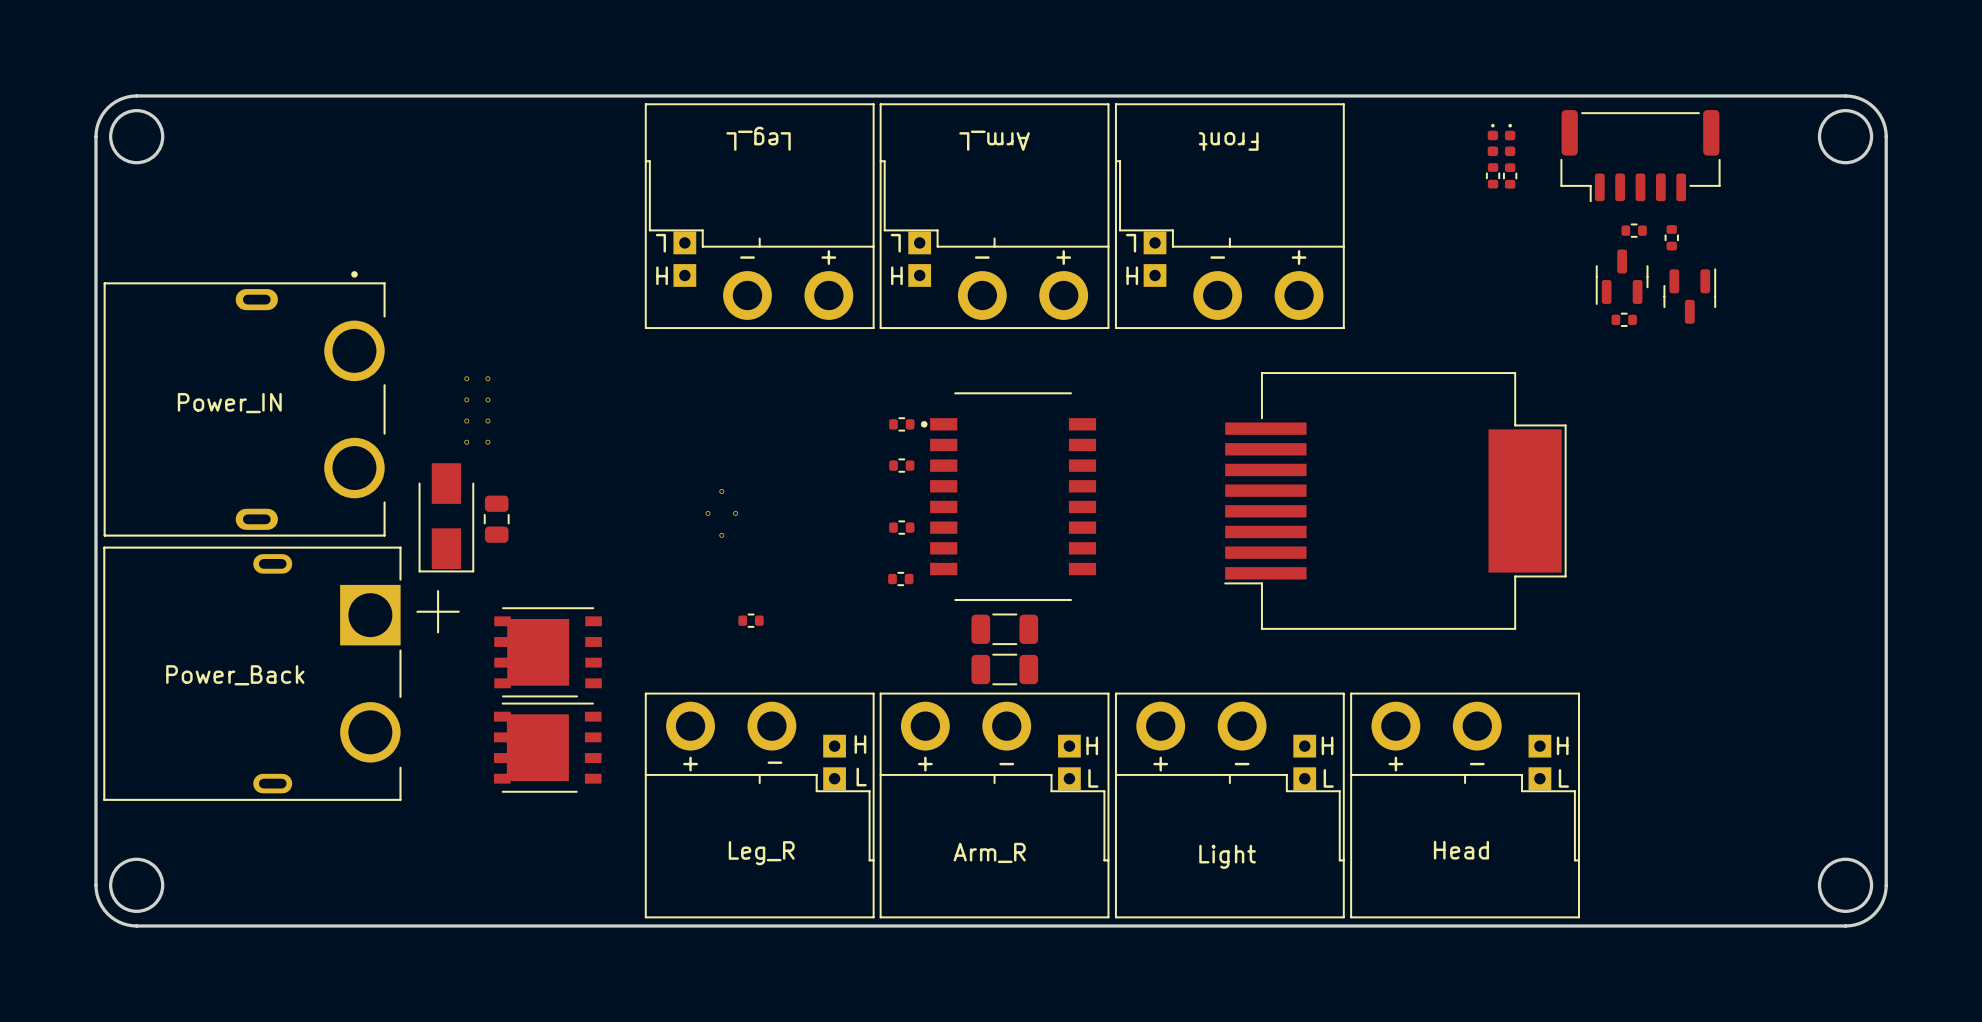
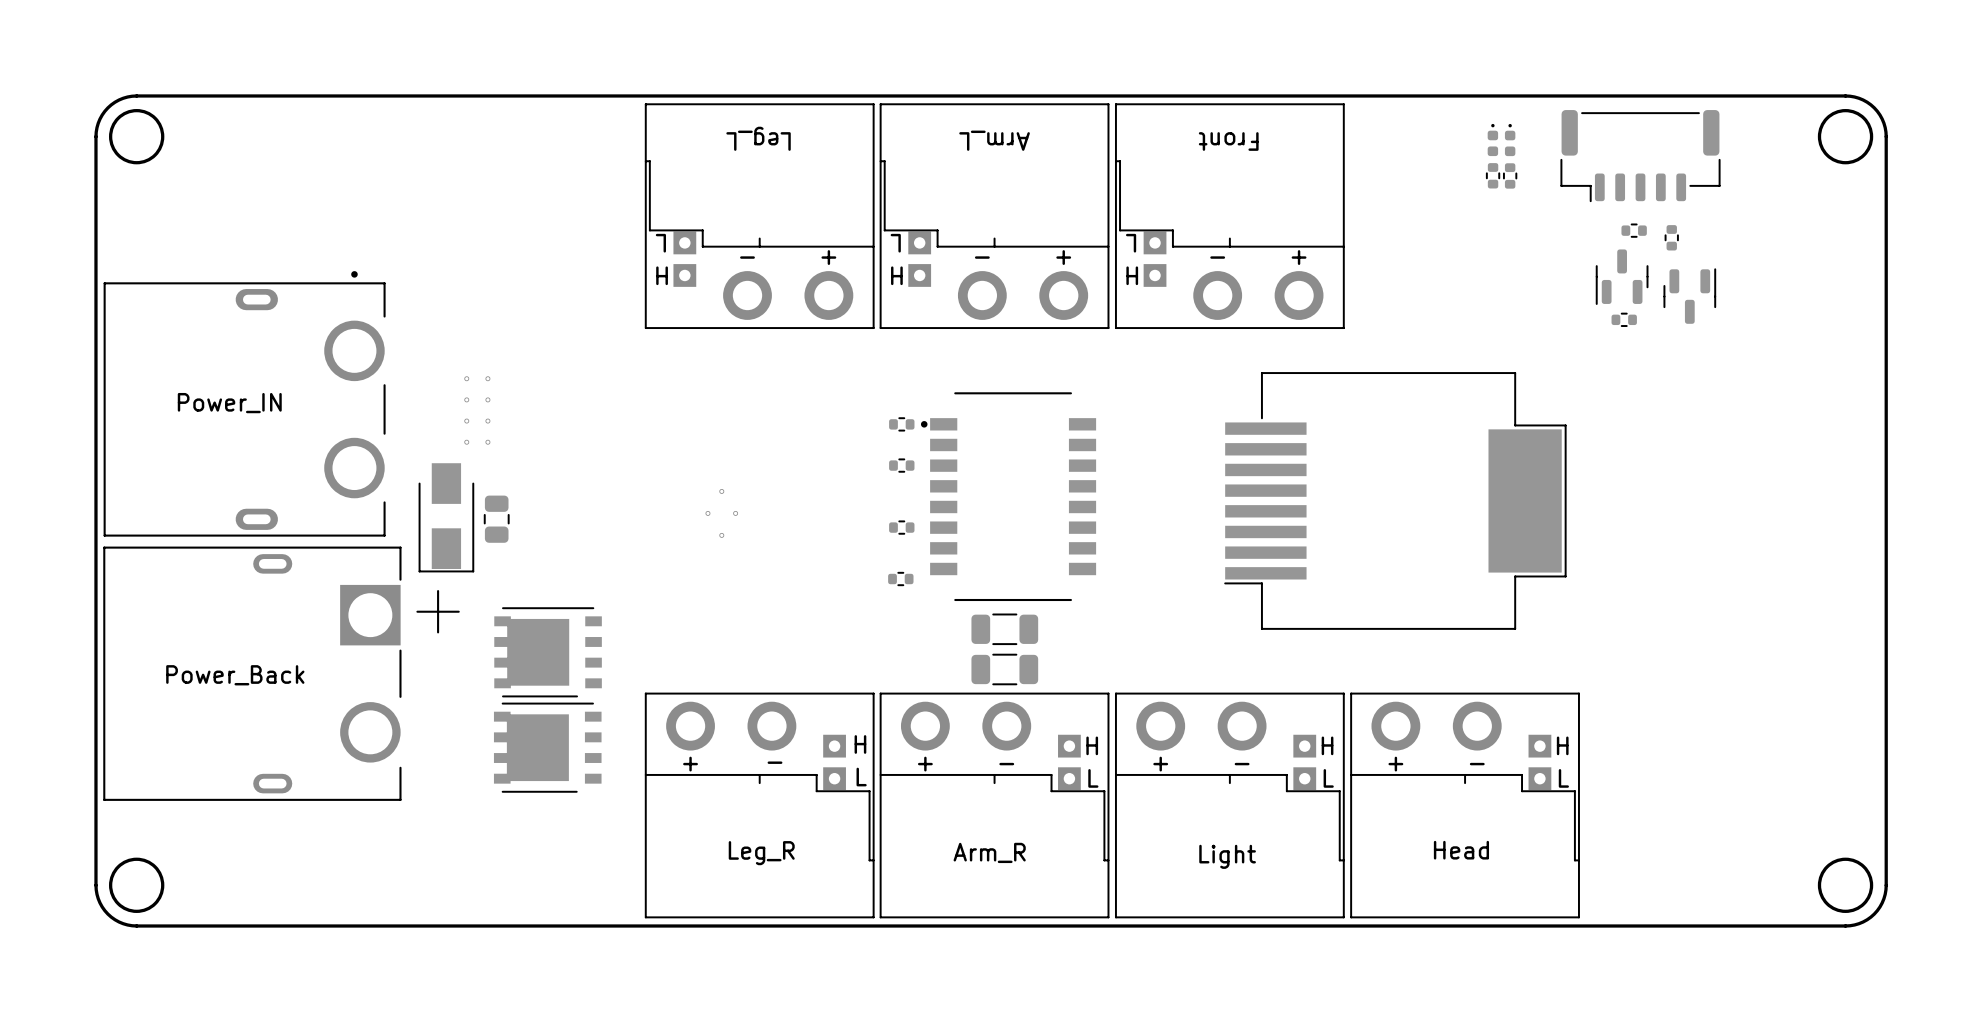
part: (751, 620) -> none

